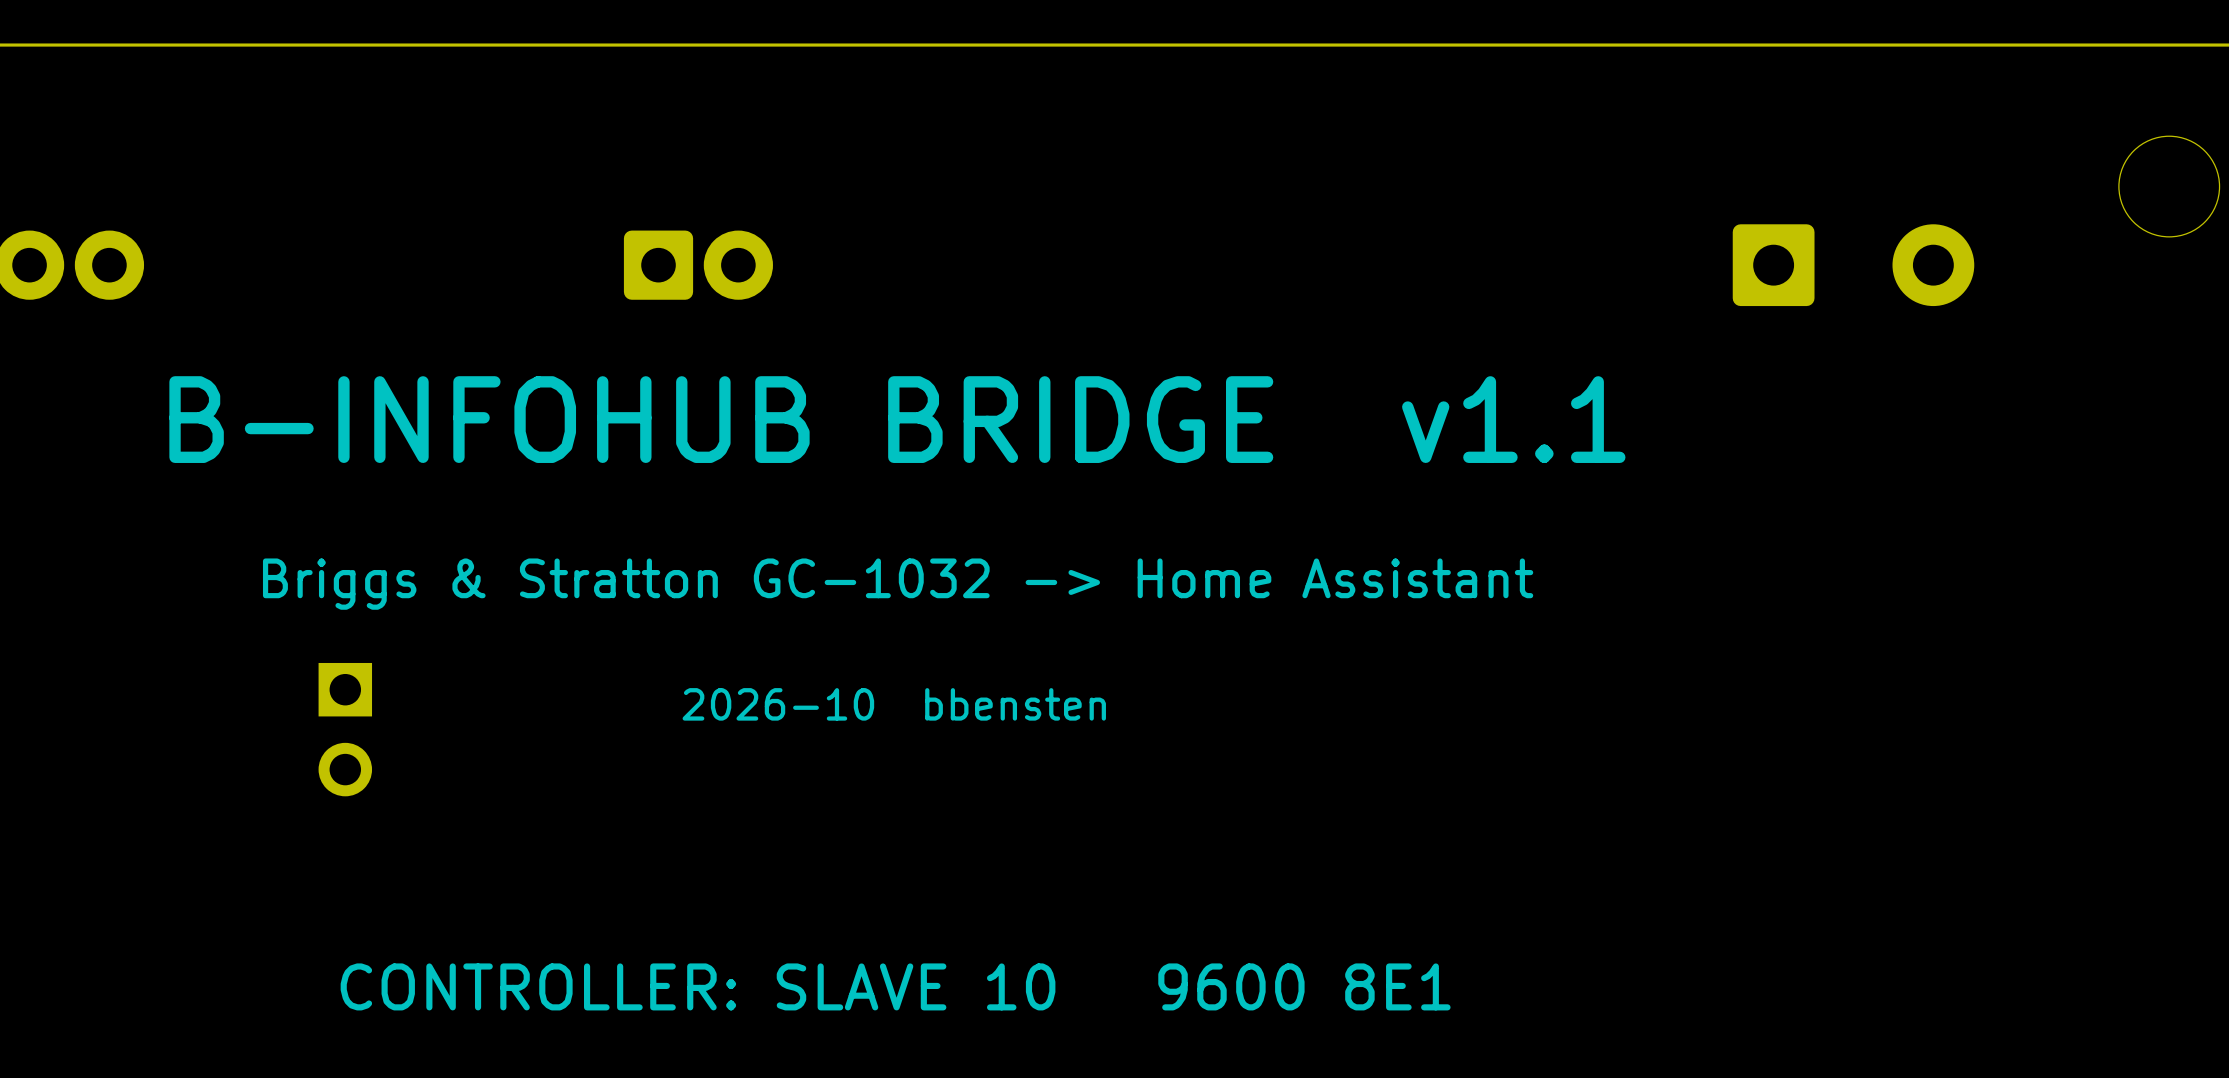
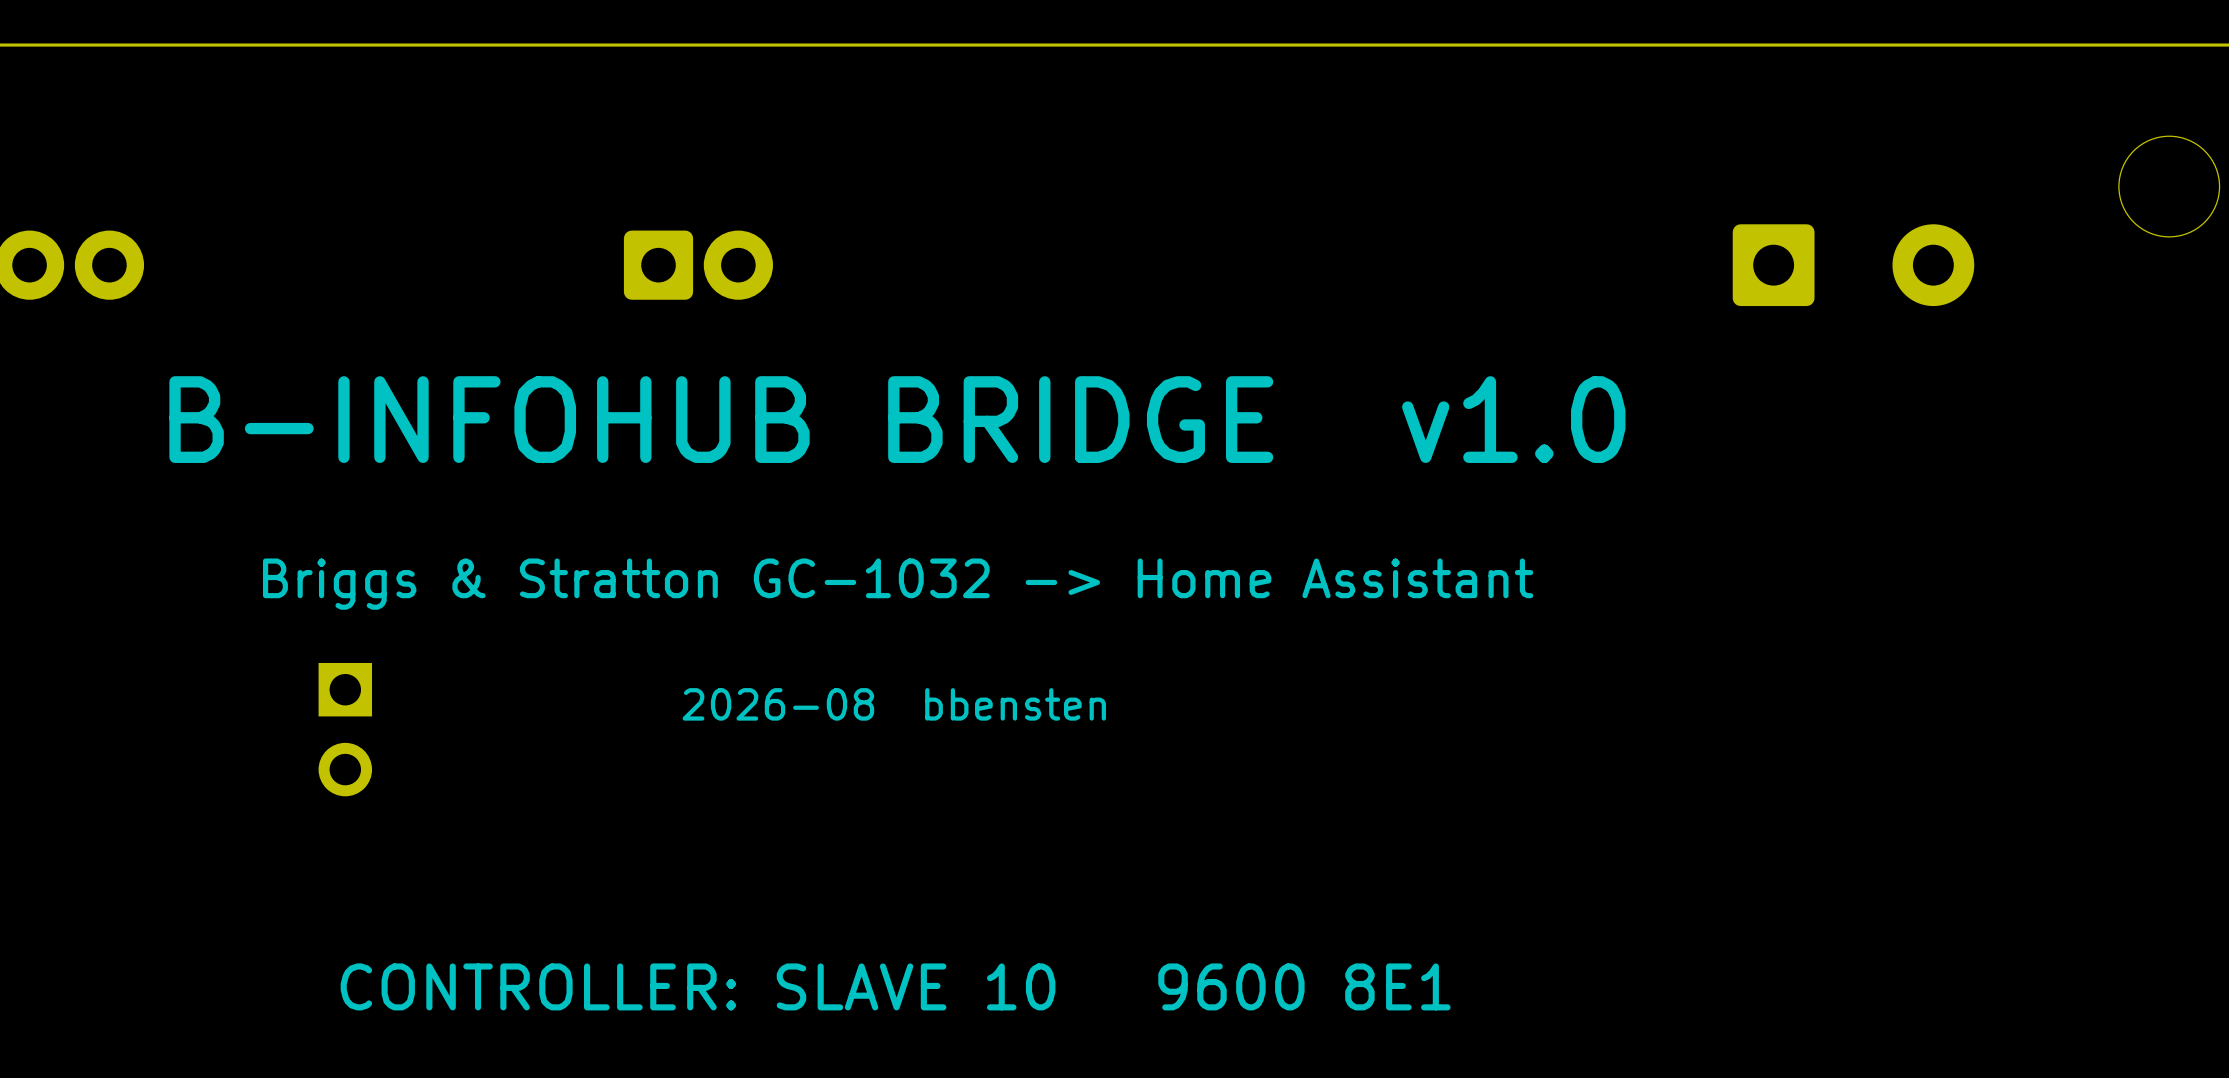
text: B-INFOHUB BRIDGE v1.1 (897, 419) -> B-INFOHUB BRIDGE v1.0 (897, 419)
text: 2026-10 bbensten (894, 704) -> 2026-08 bbensten (894, 704)

